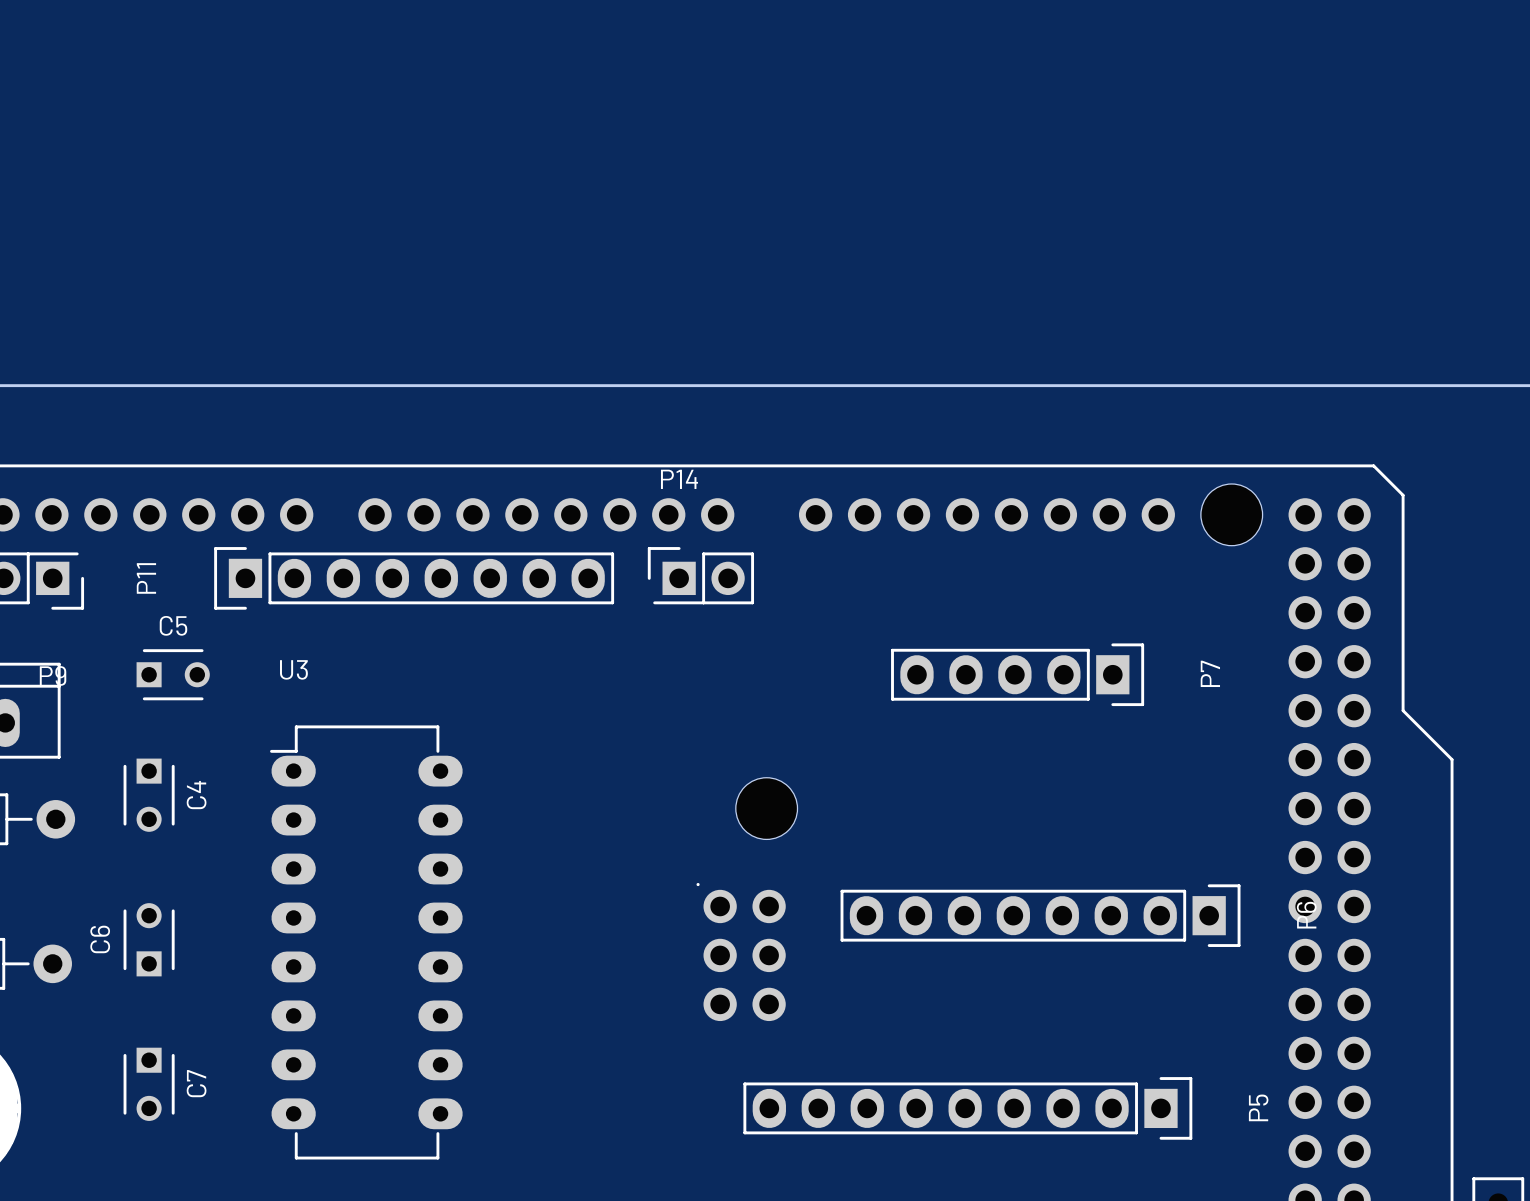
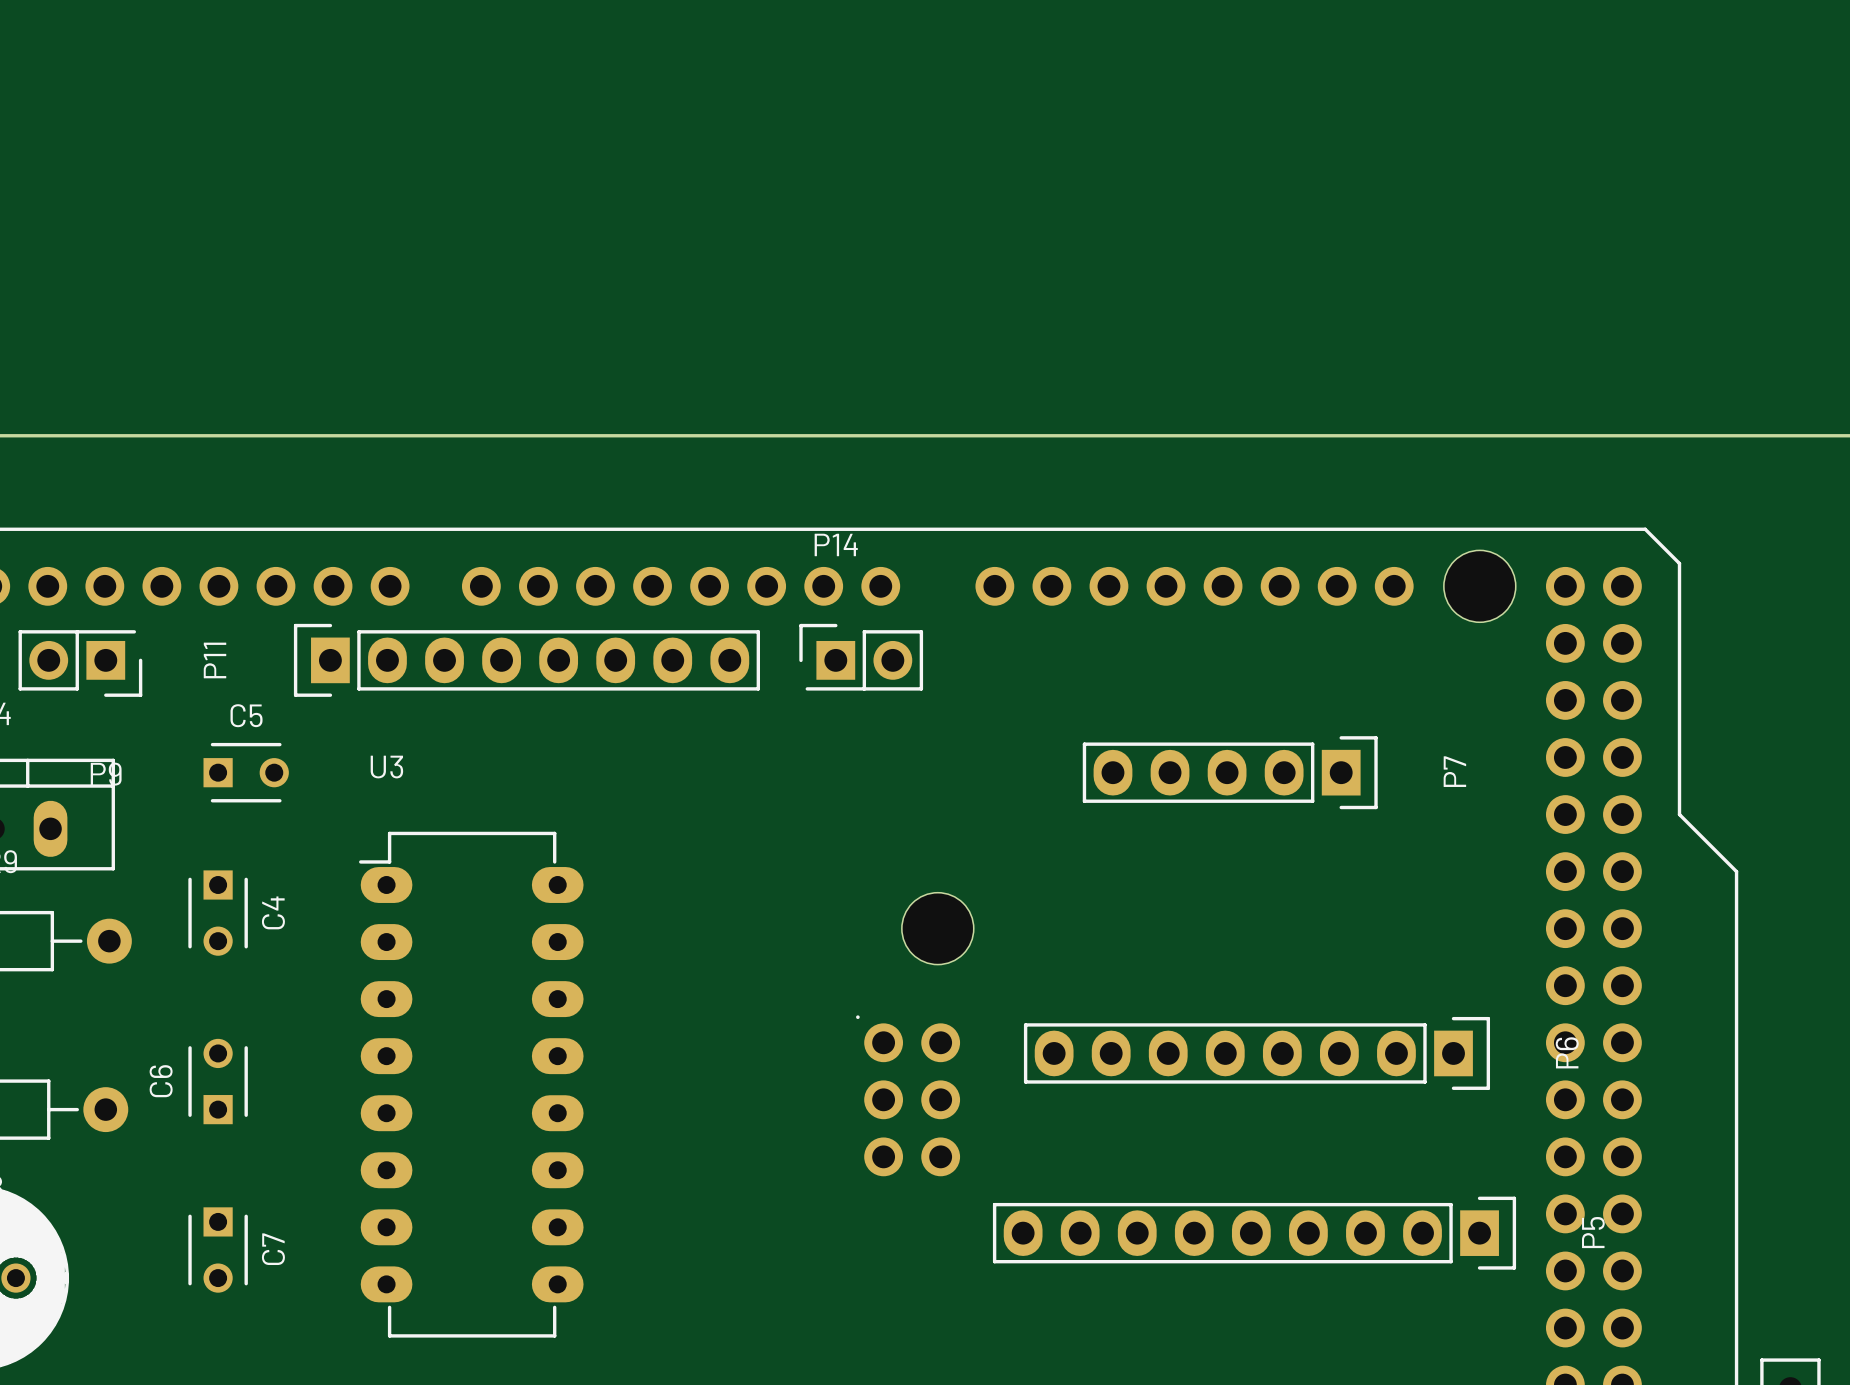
P5 position: (967, 1108) -> (1254, 1233)

